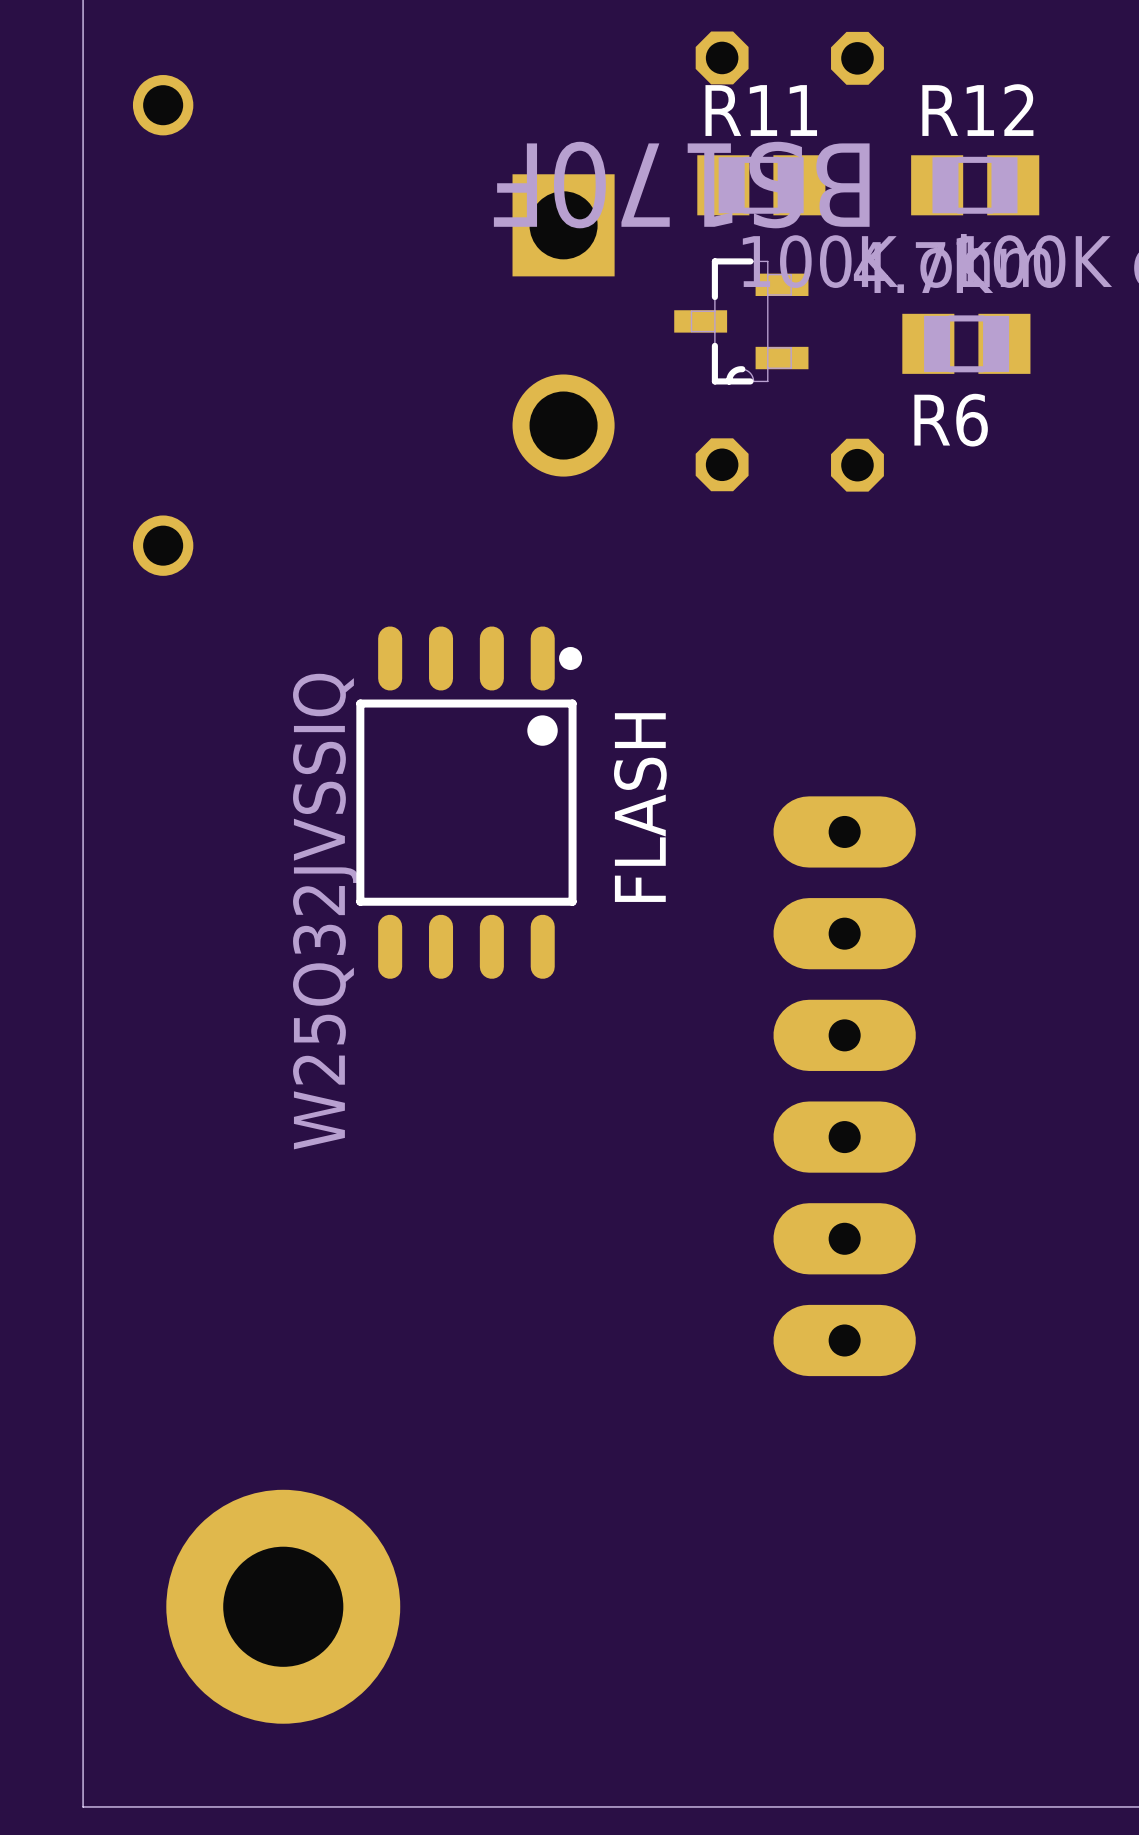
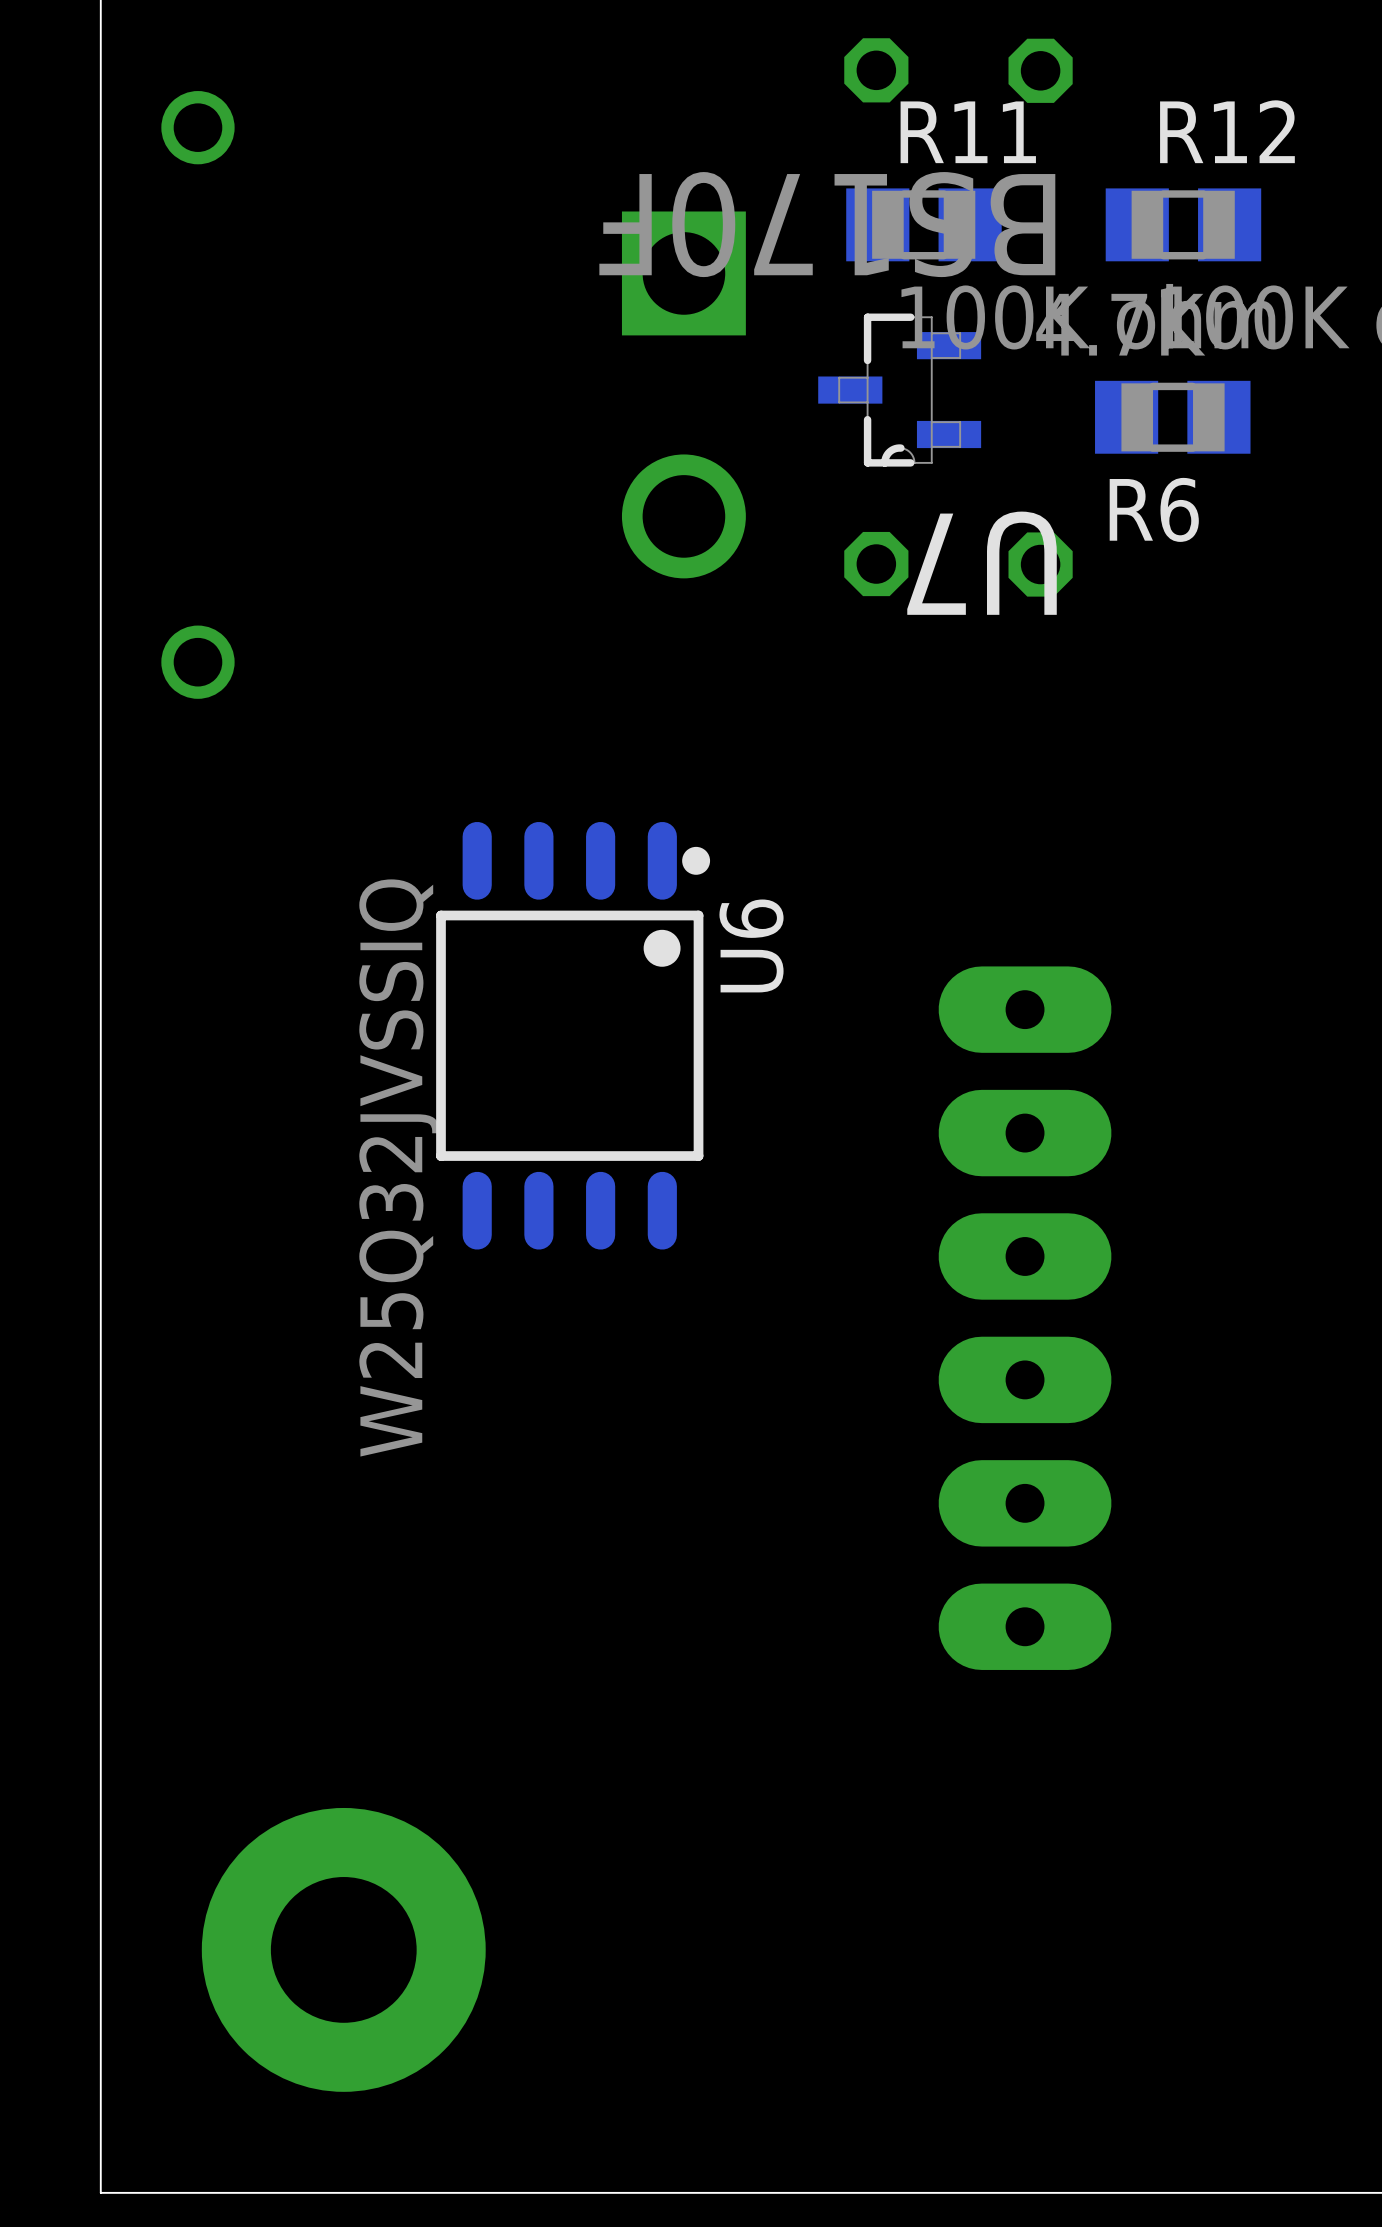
R11 name position: R11 (761, 110) -> R11 (968, 132)
R12 name position: R12 (977, 110) -> R12 (1227, 131)
U7 name: none -> U7 (982, 563)
part: W25Q32JVSSIQ (469, 802) -> none
text: FLASH (640, 807) -> none
U6: none -> W25Q32JVSSIQ (573, 1035)

